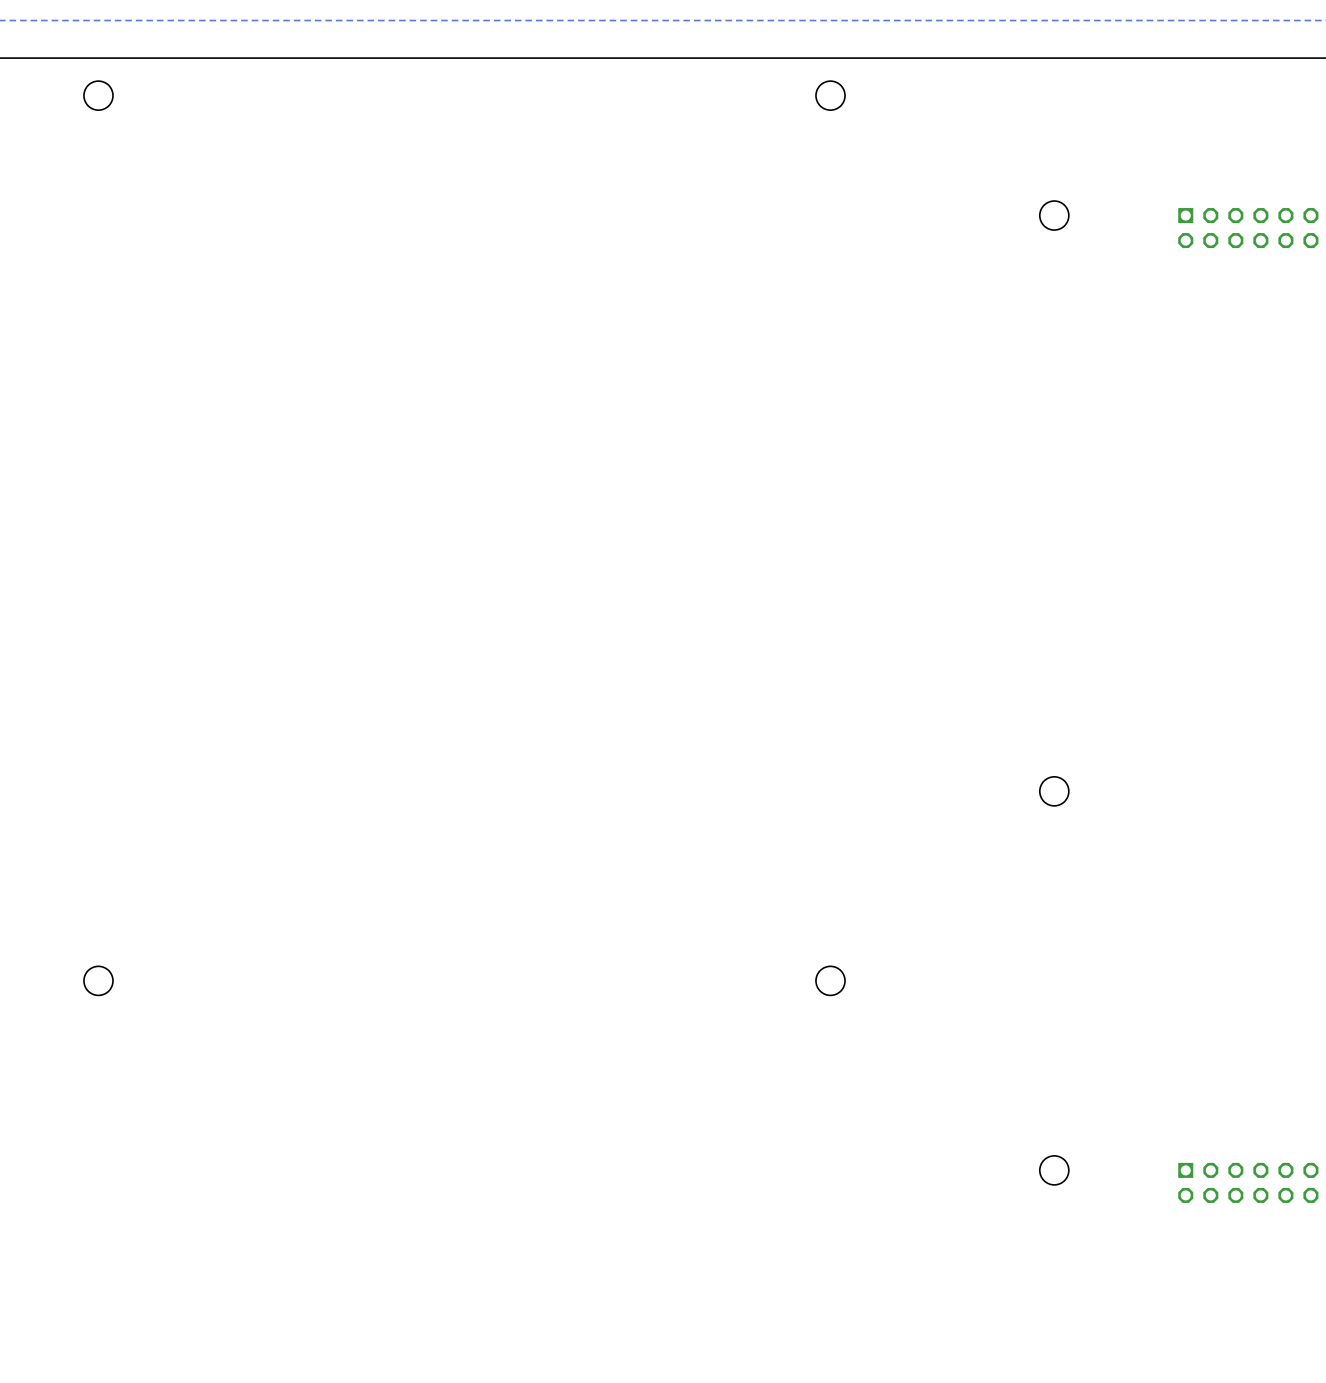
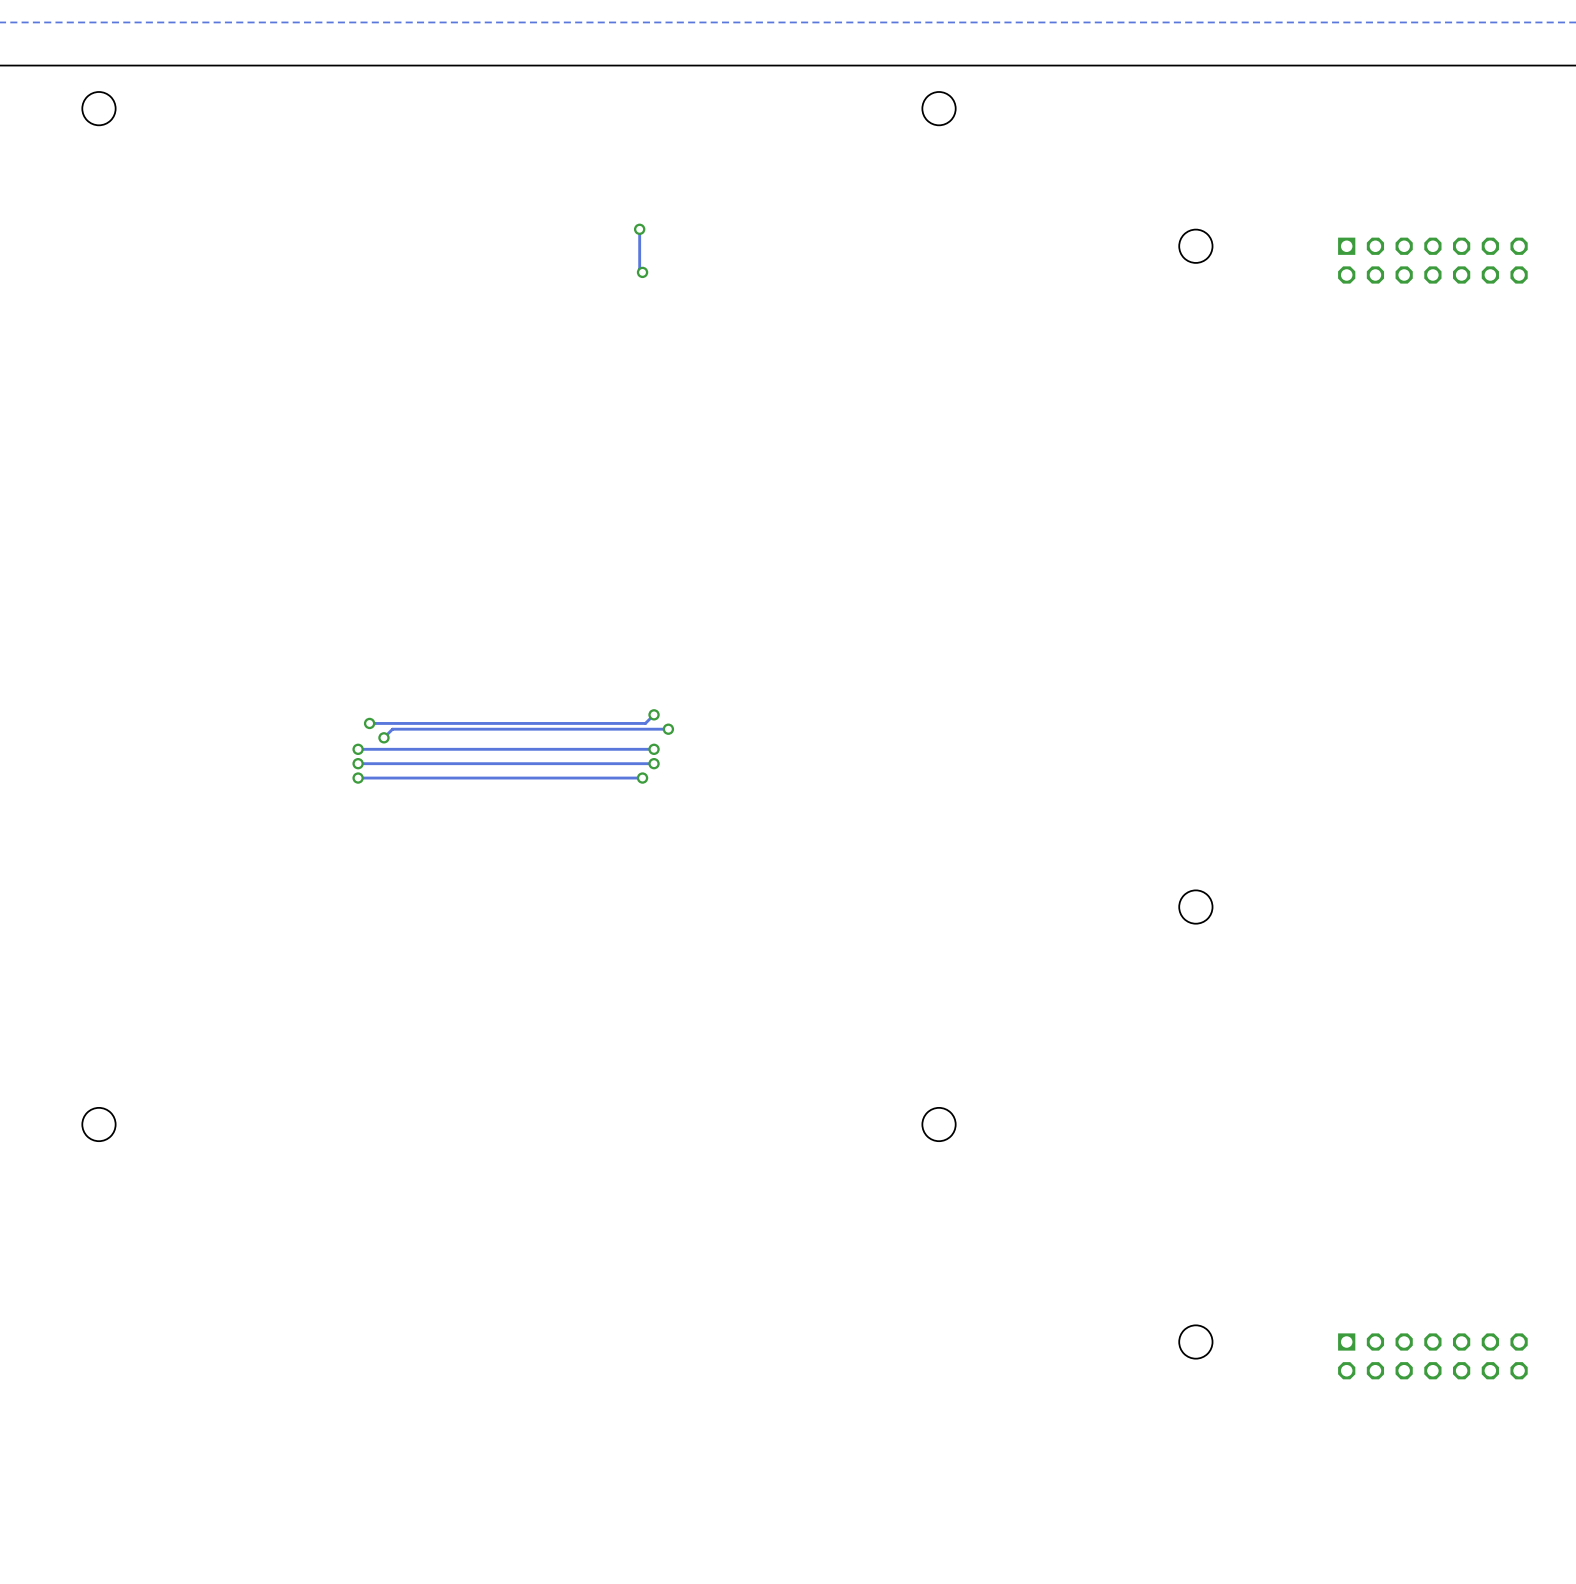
track: none -> (639, 229) (639, 269) (642, 272)
via: none -> (639, 229)
via: none -> (642, 272)
track: none -> (654, 714) (645, 723) (369, 723)
via: none -> (654, 714)
via: none -> (369, 723)
track: none -> (668, 729) (392, 729) (383, 737)
via: none -> (668, 729)
via: none -> (383, 737)
via: none -> (358, 749)
track: none -> (654, 749) (358, 749)
via: none -> (654, 749)
via: none -> (358, 763)
track: none -> (654, 763) (358, 763)
via: none -> (654, 763)
via: none -> (358, 778)
track: none -> (642, 778) (358, 778)
via: none -> (642, 778)

